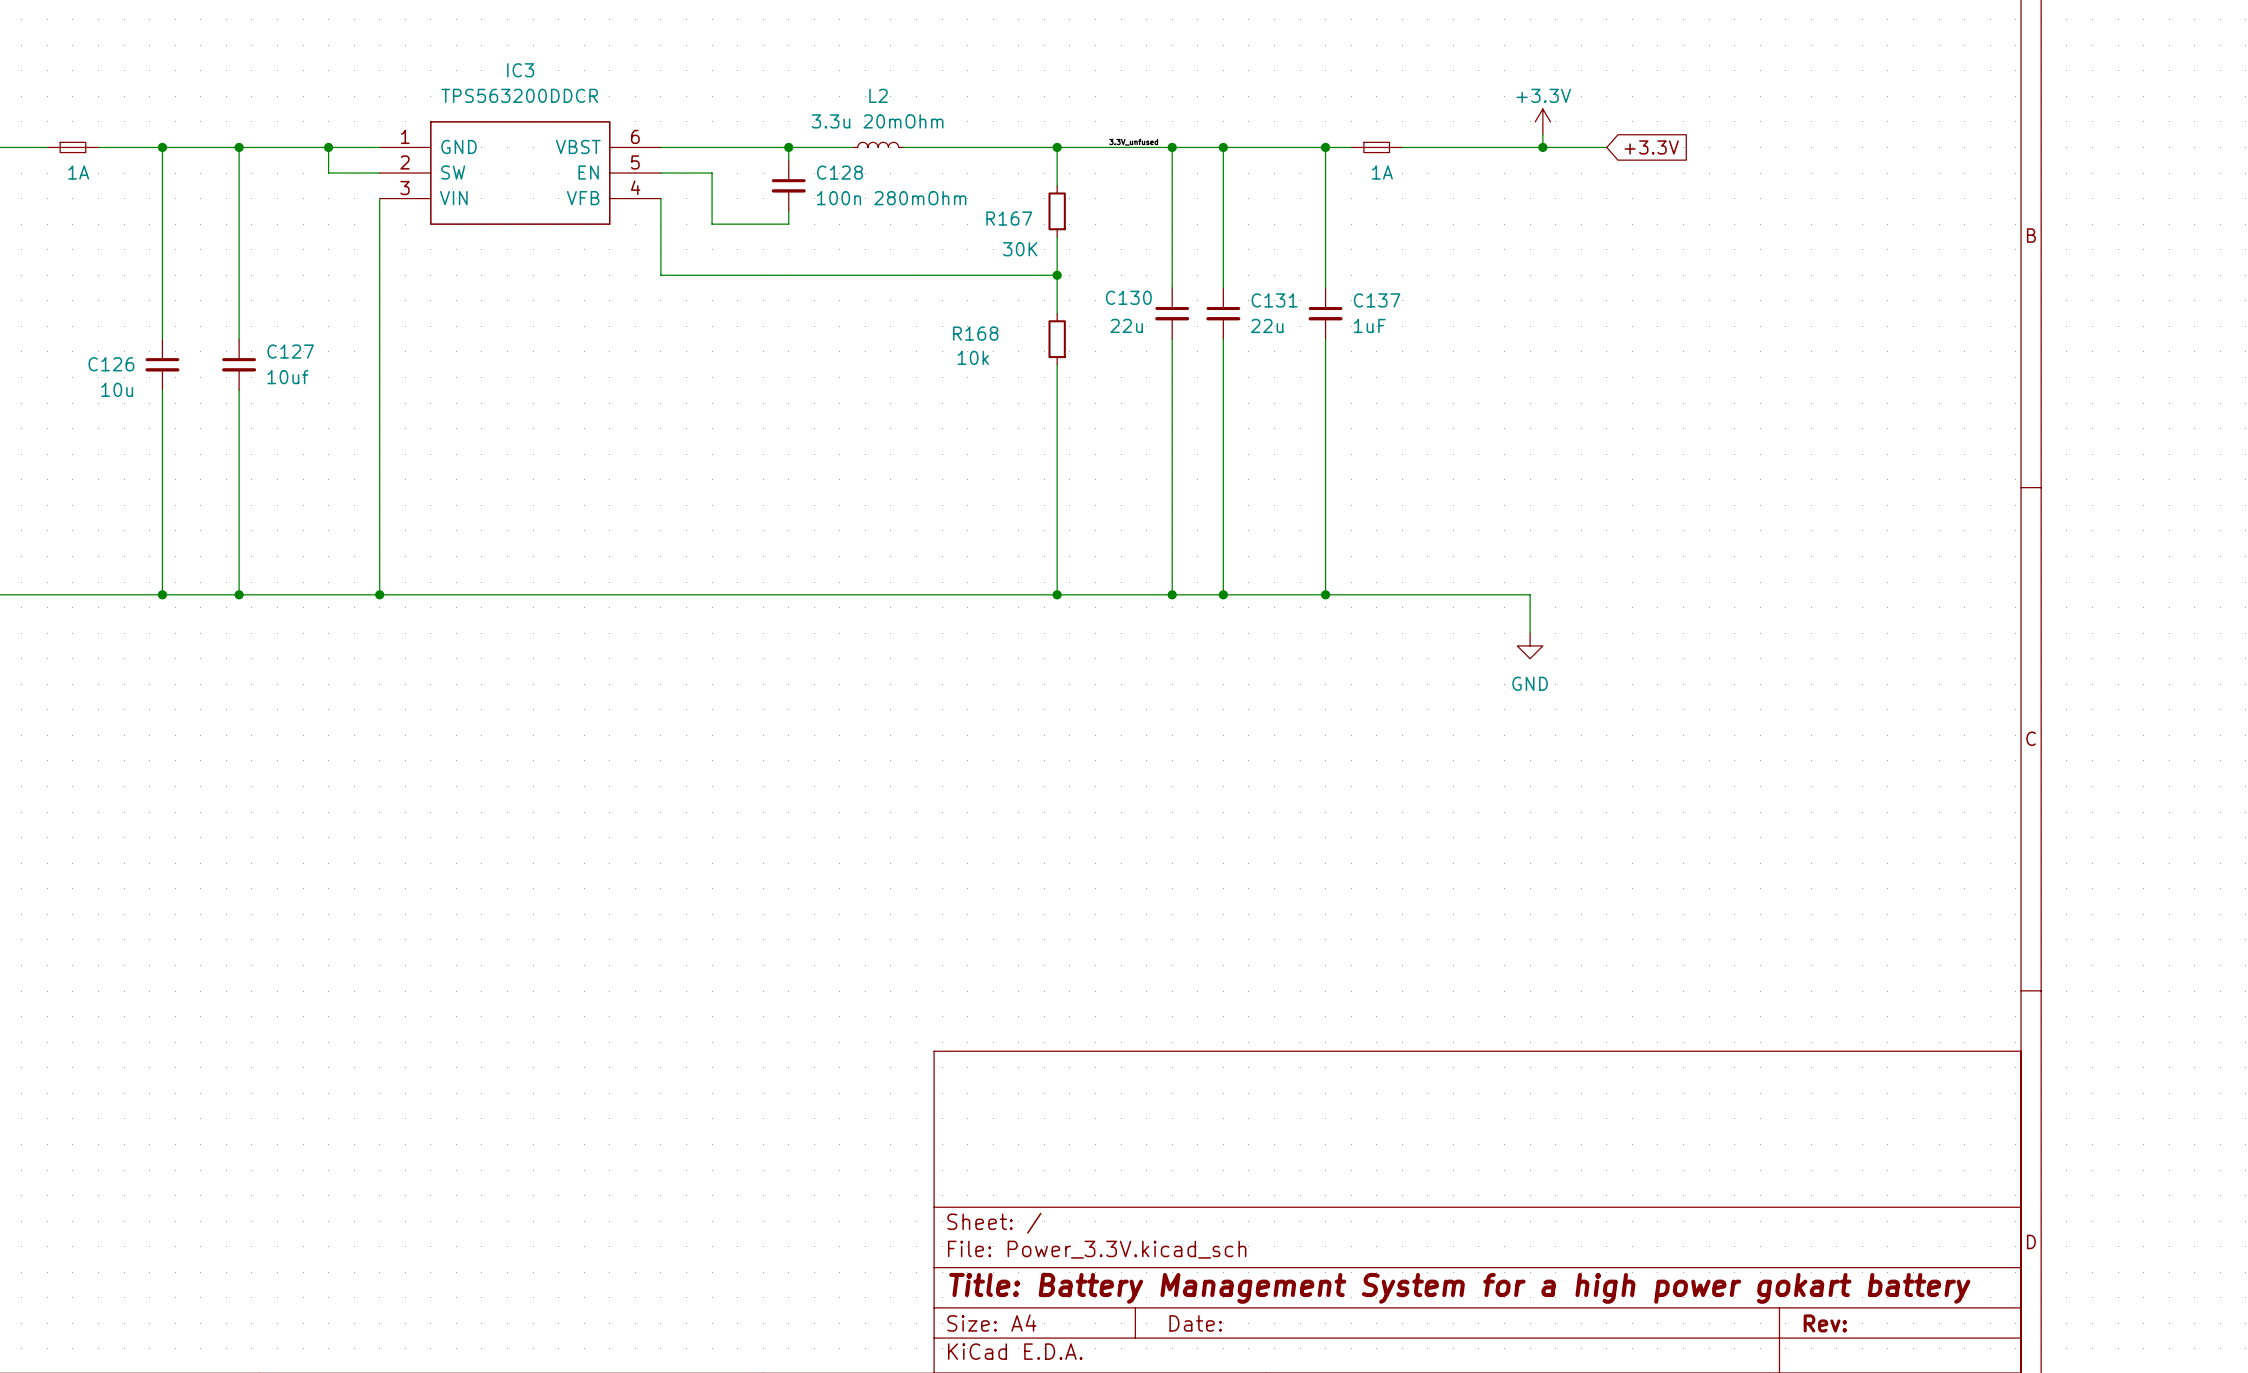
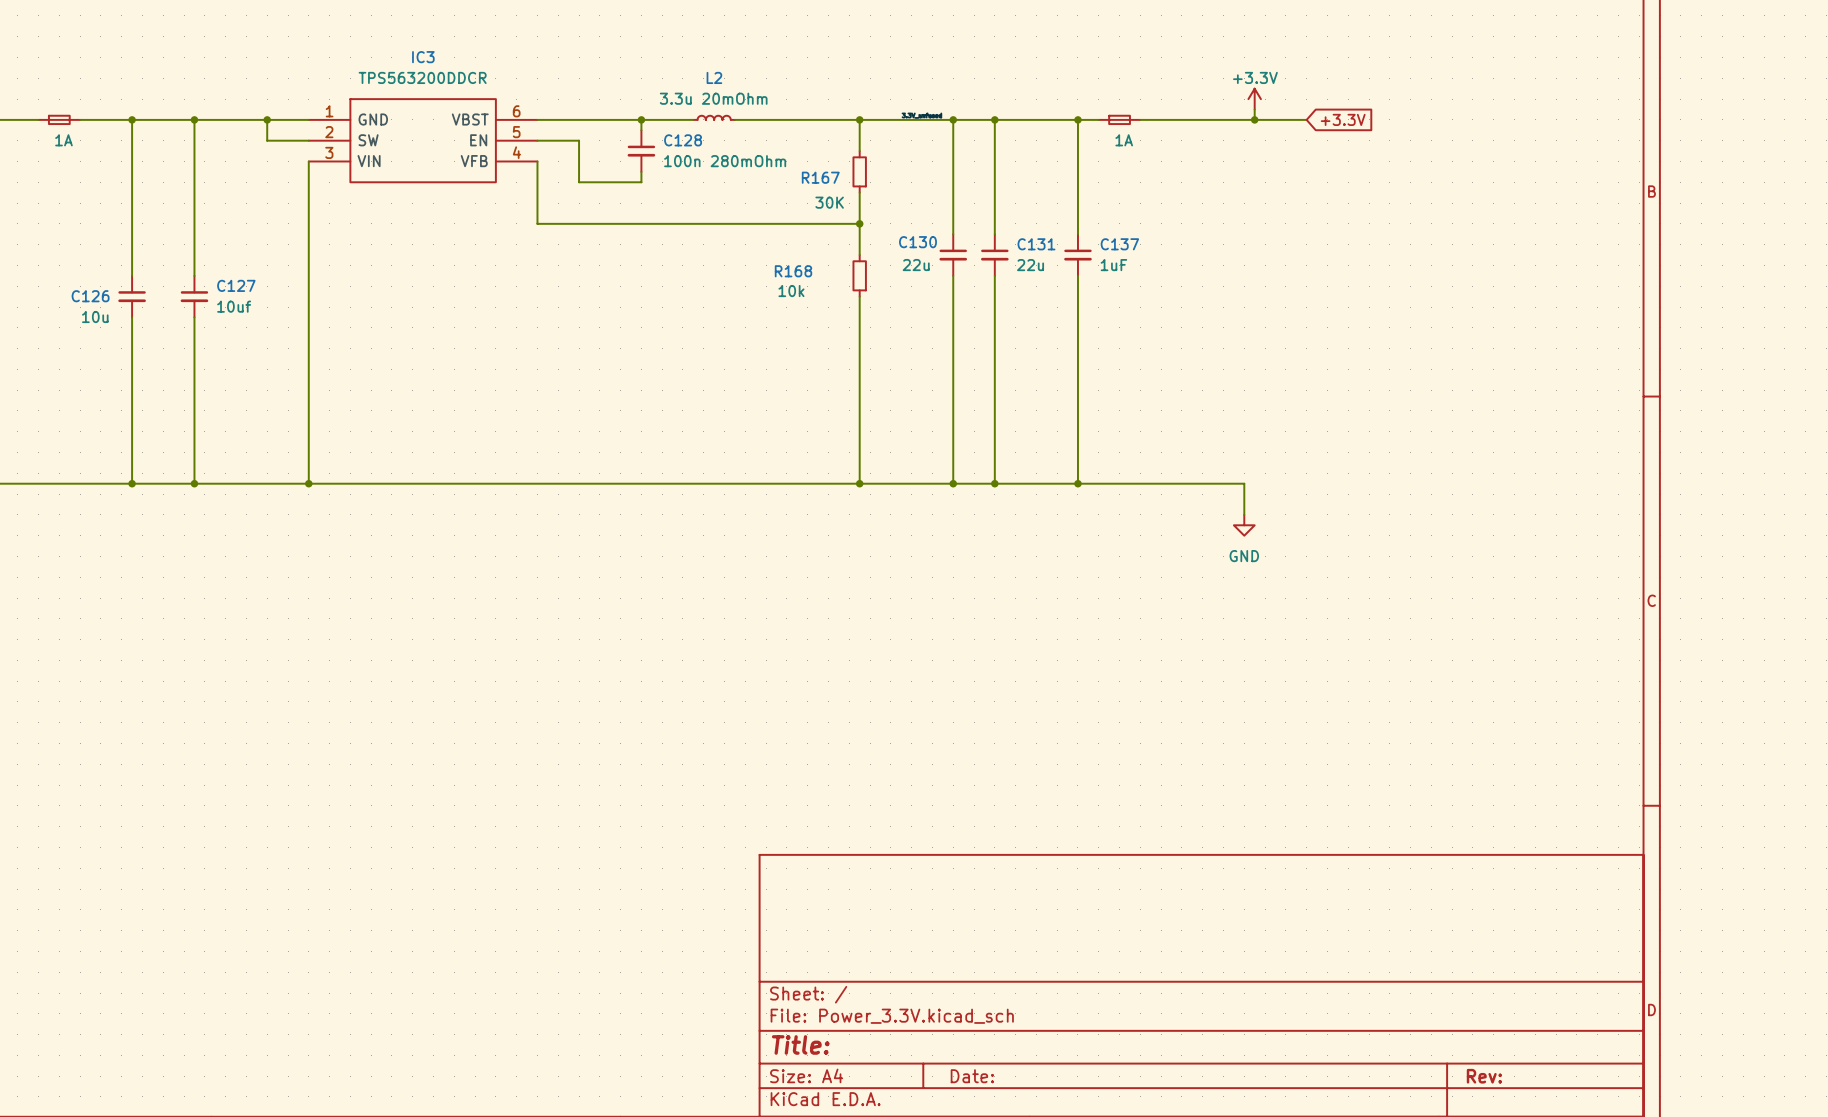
title block: Title: Battery Management System for a high power gokart battery (1459, 1288) -> Title: (800, 1044)

